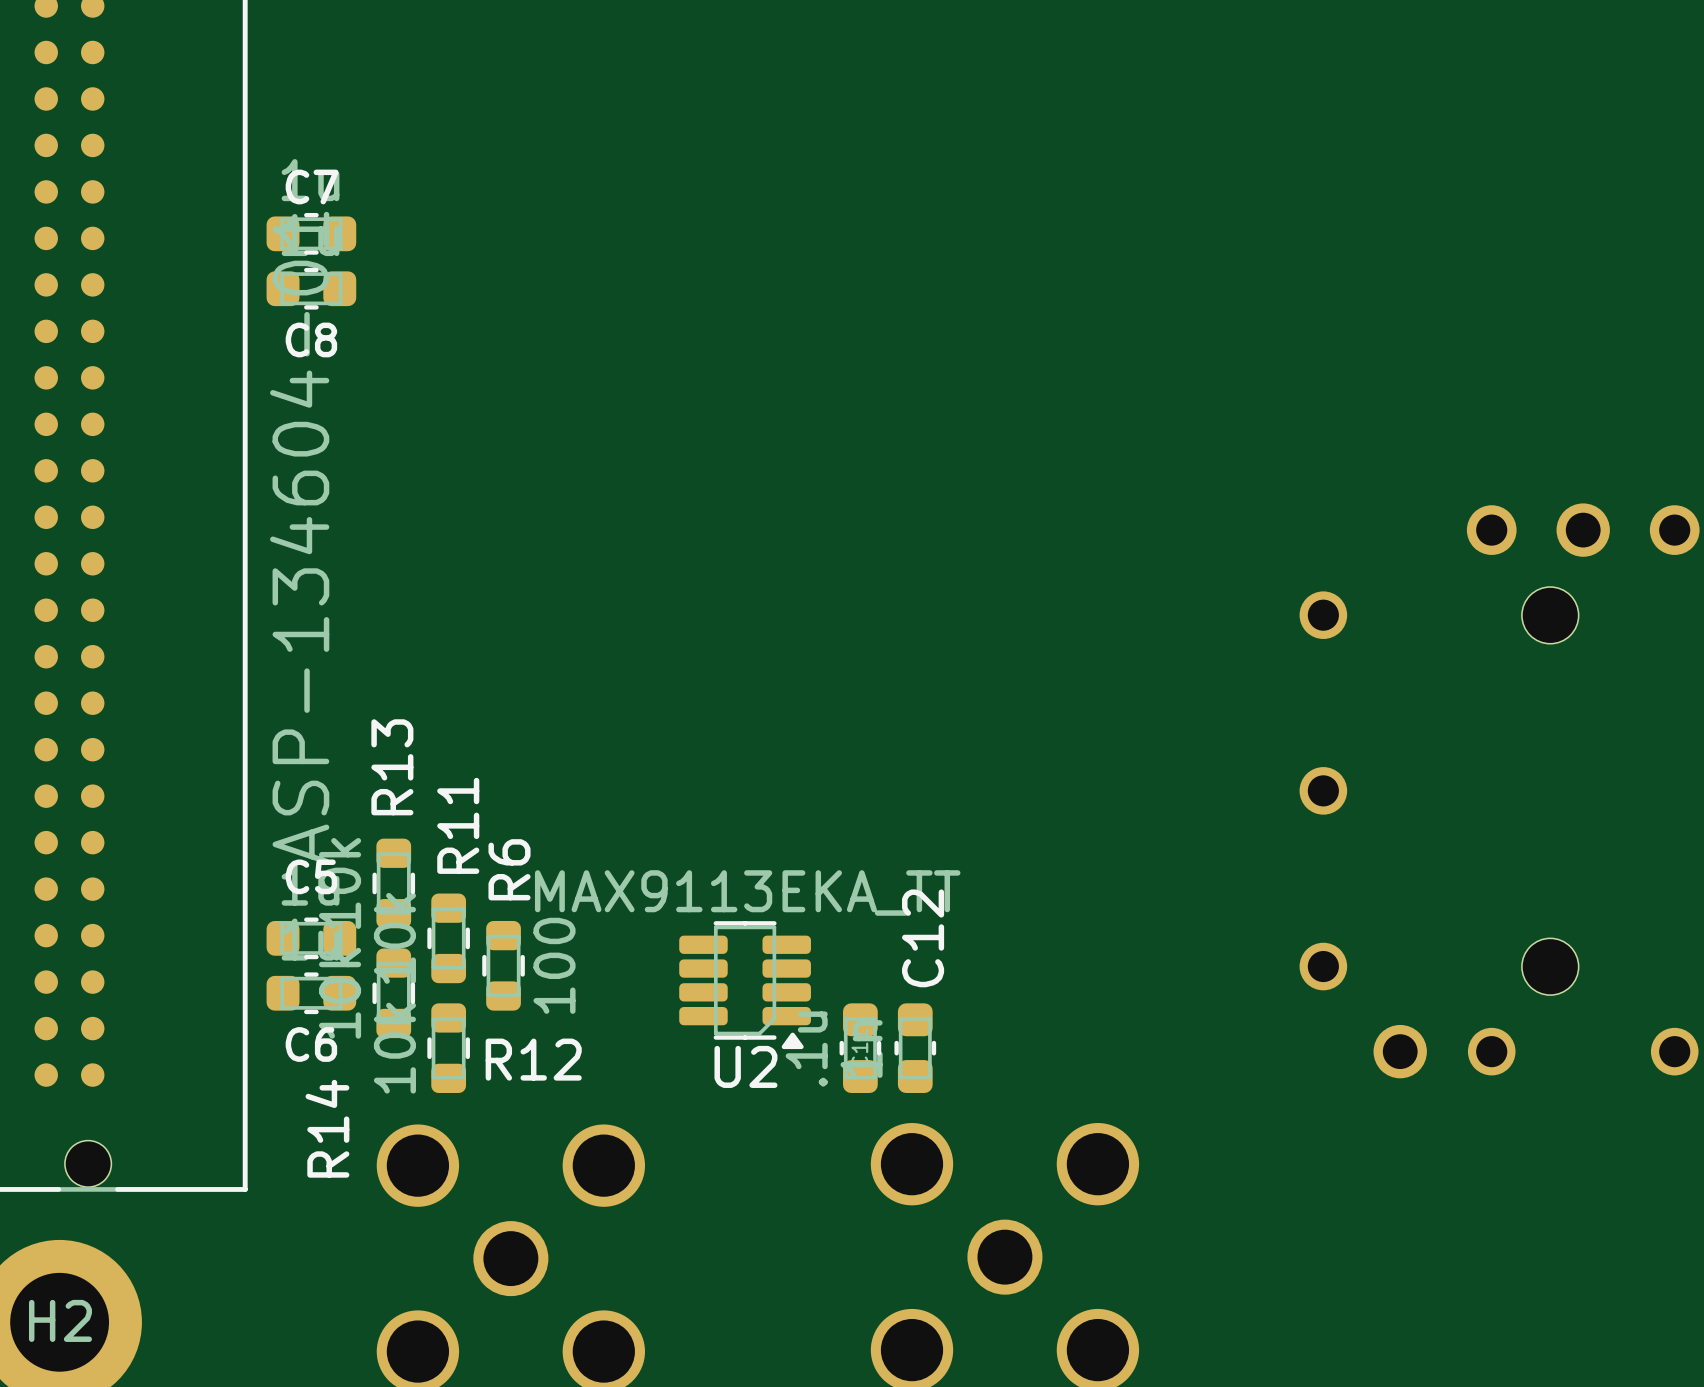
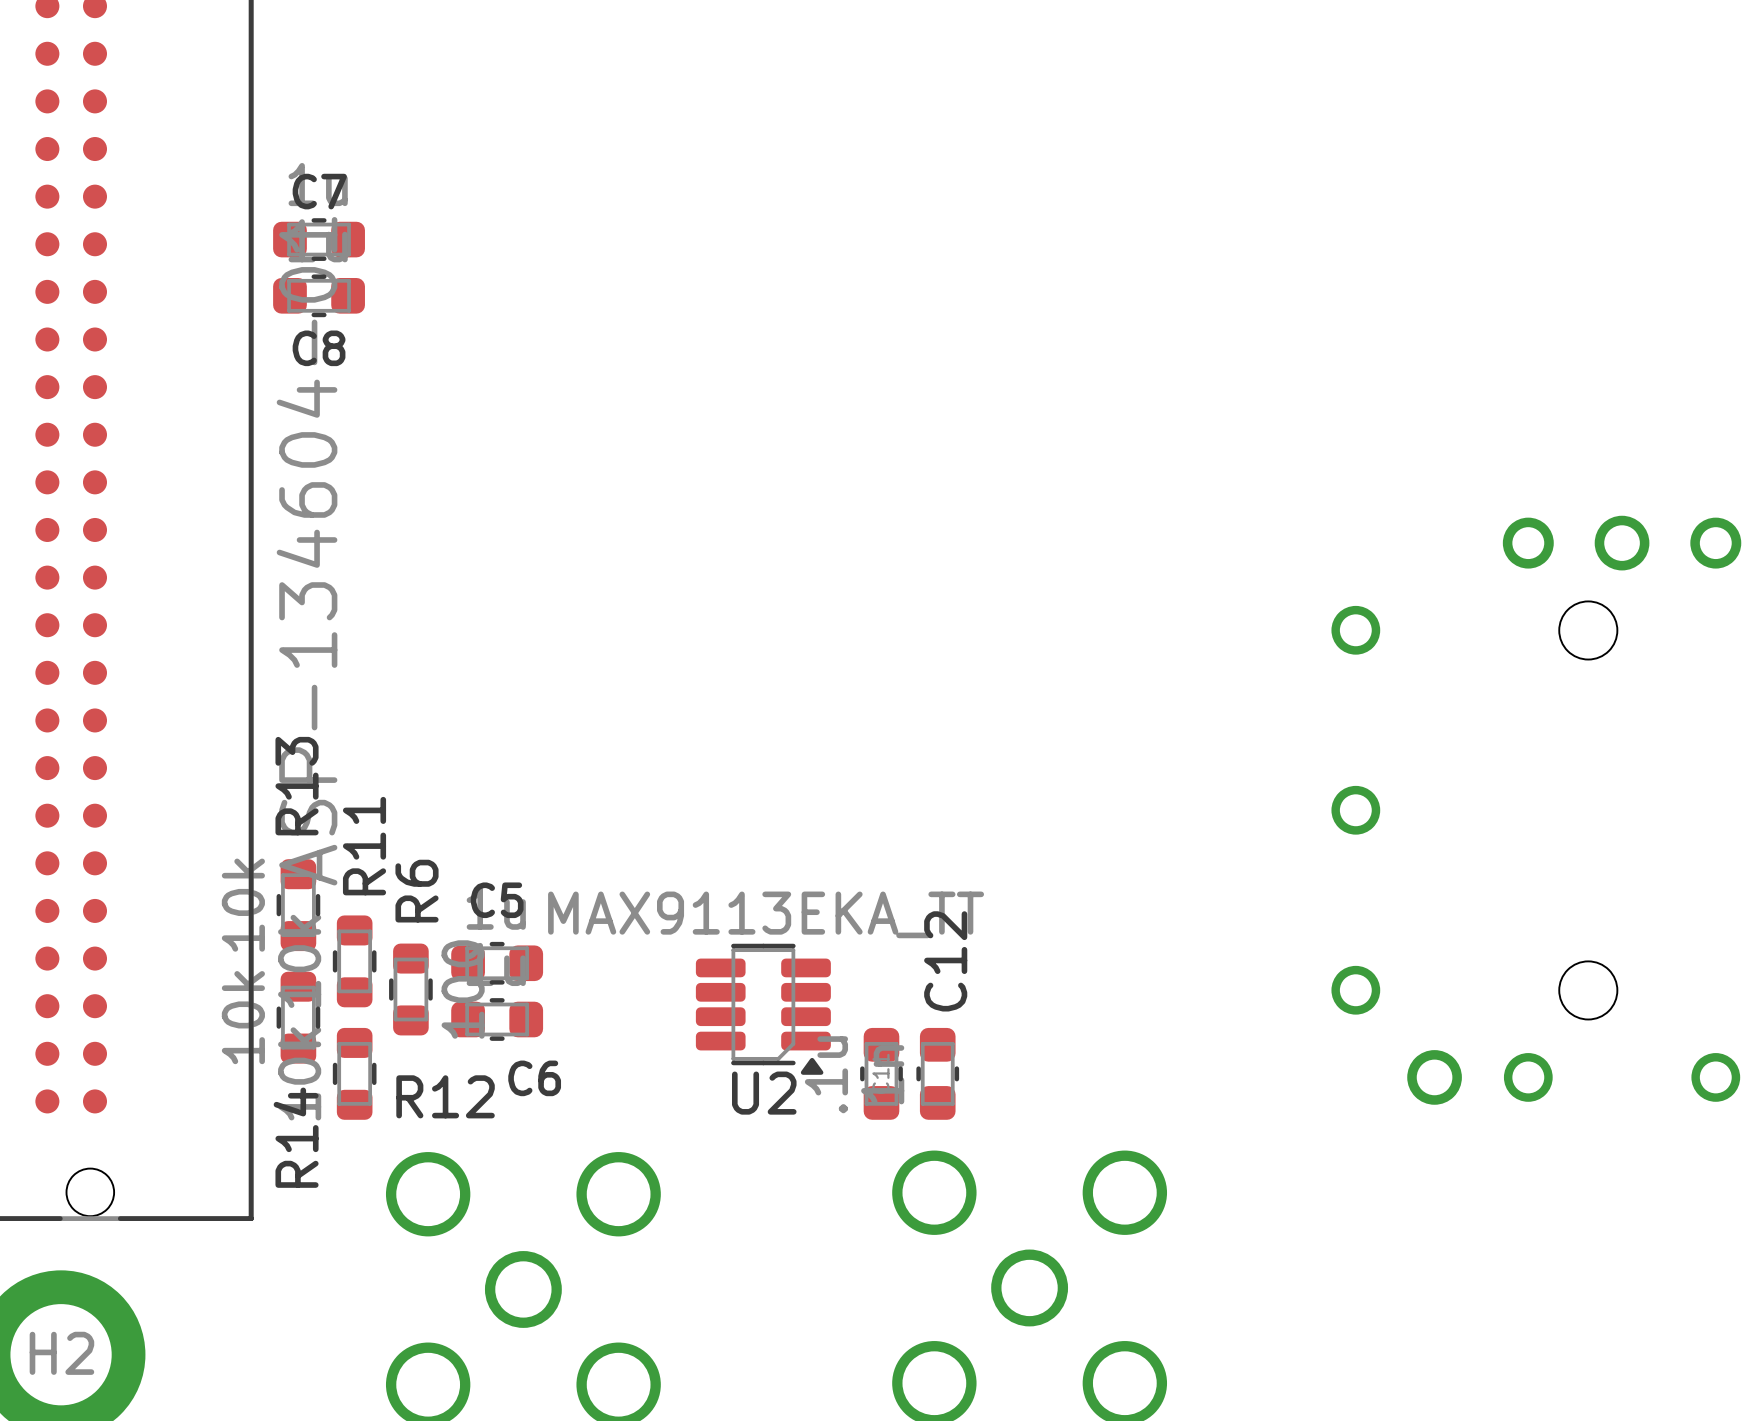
R13 position: (393, 883) -> (298, 905)
C5 position: (311, 938) -> (497, 963)
R11 position: (448, 938) -> (354, 961)
R6 position: (503, 965) -> (410, 989)
C6 position: (311, 993) -> (497, 1019)
R14 position: (393, 993) -> (298, 1017)
C6 name position: C6 (311, 1044) -> C6 (534, 1078)
R12 position: (448, 1048) -> (354, 1073)
R12 name position: R12 (533, 1059) -> R12 (445, 1096)
R14 name position: R14 (327, 1128) -> R14 (296, 1137)

